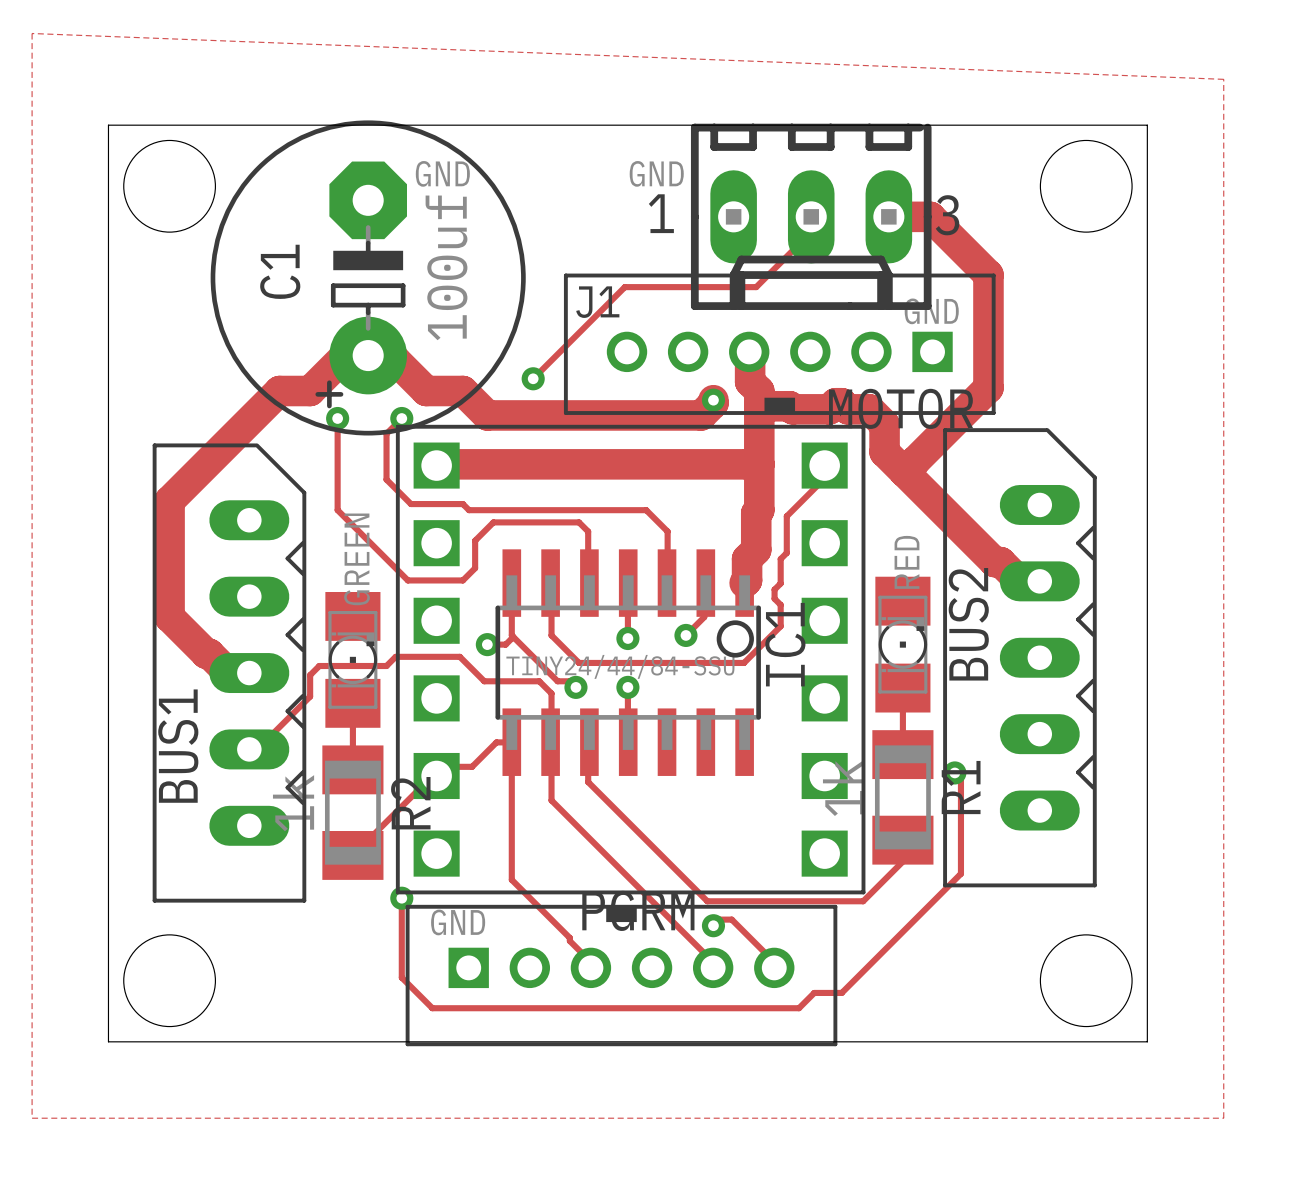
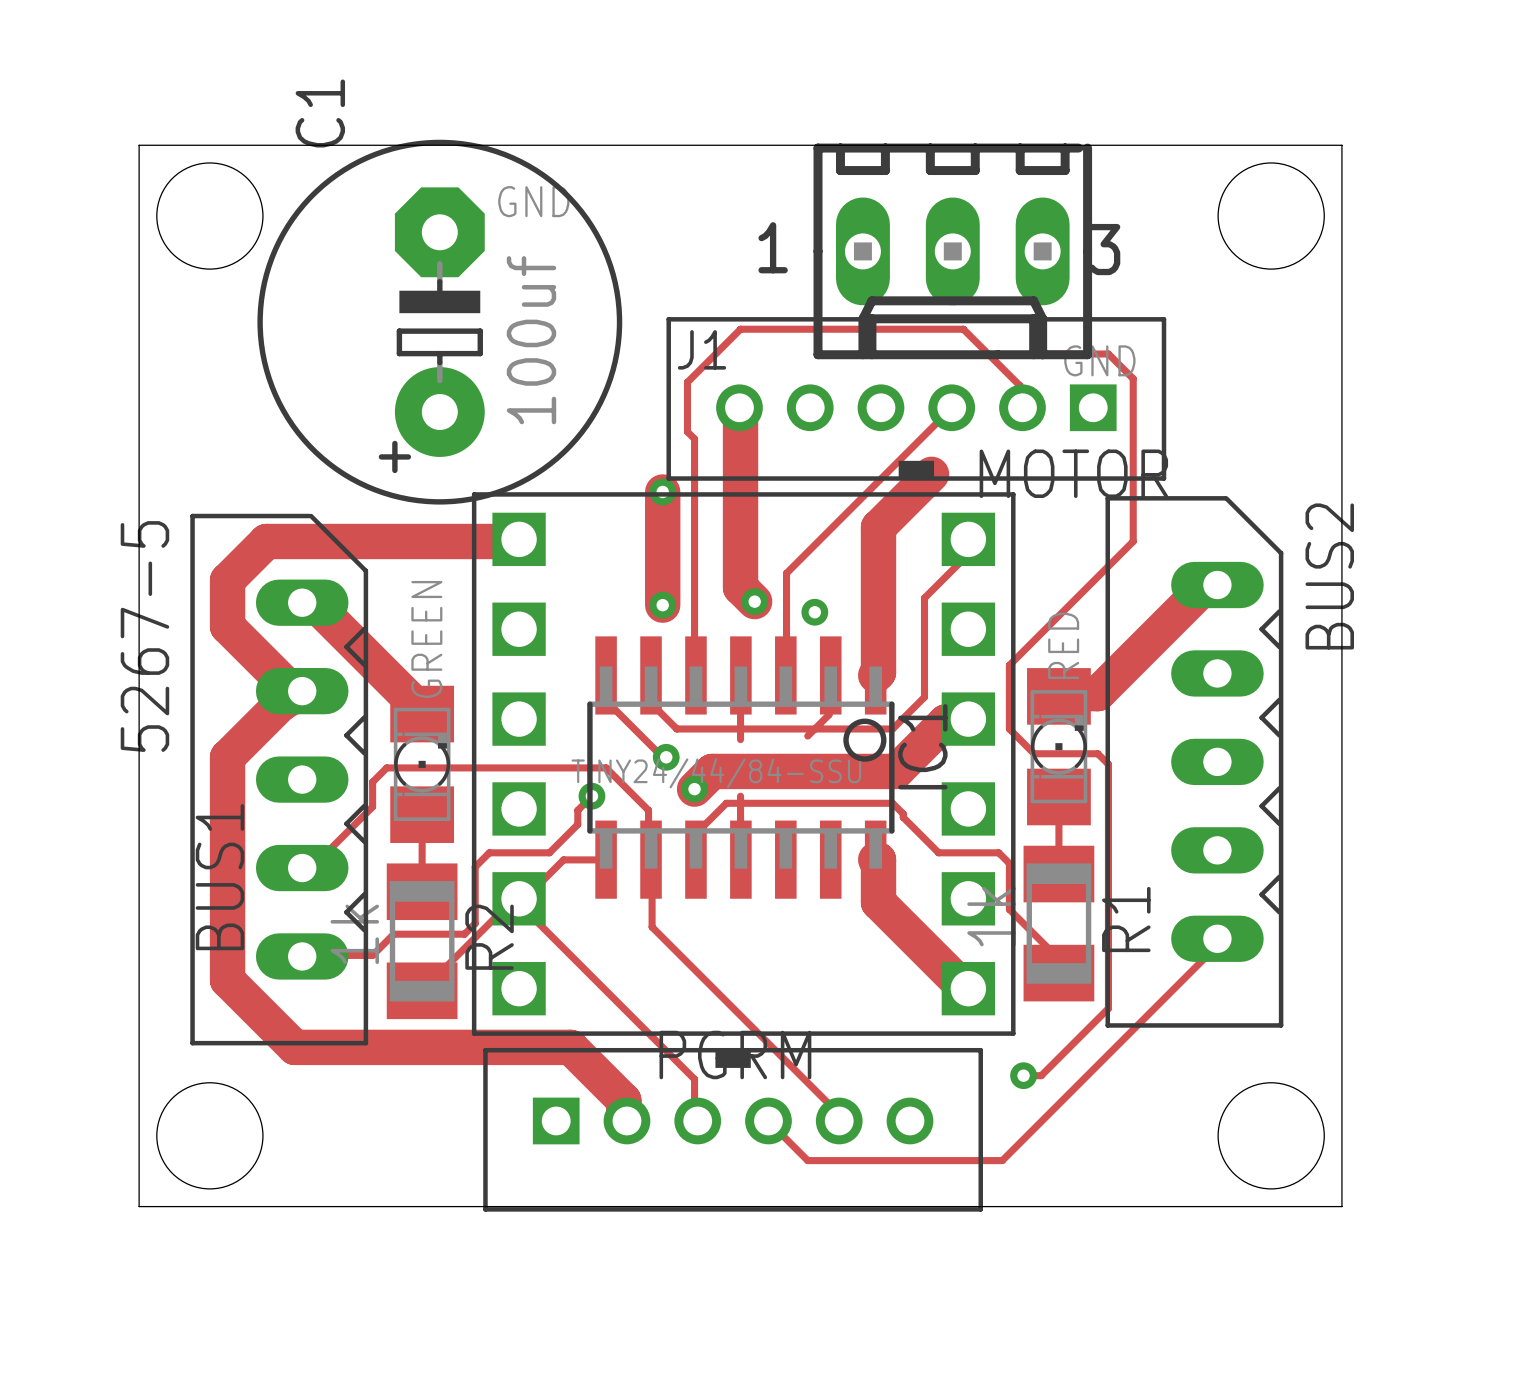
zone outline: (32, 33) (32, 1118) (1223, 1118) (1223, 79) (32, 33) -> none
text: GND (656, 173) -> none
track: (811, 216) (811, 232) (756, 287) (624, 287) -> (1022, 407) (1020, 407) (1020, 385) (963, 329) (740, 329) (737, 332)
track: (888, 216) (930, 216) (988, 274) (988, 387) (904, 471) -> none
C1 value position: 100uf (446, 267) -> 100uf (531, 340)
C1 name position: C1 (280, 271) -> C1 (320, 113)
track: none -> (1030, 354) (1108, 354) (1133, 378) (1133, 541) (1009, 665) (1009, 728) (1034, 753) (1097, 753) (1108, 764) (1108, 1008) (1041, 1075) (1023, 1075)
track: (582, 329) (533, 378) -> (687, 382) (687, 431) (694, 438) (694, 615)
track: none -> (739, 407) (740, 587) (754, 601)
track: (749, 351) (750, 381) (759, 391) (759, 510) (756, 513) (756, 549) (747, 559) -> (931, 474) (878, 527) (878, 647)
via position: (533, 378) -> (662, 491)
track: (713, 400) (713, 403) (701, 415) (487, 415) (462, 391) (426, 391) (395, 360) (380, 360) (368, 355) (368, 357) (343, 357) (310, 391) (279, 391) (169, 501) (169, 617) (227, 672) (249, 673) -> none
via: (713, 400) -> none
track: (759, 406) (789, 406) (792, 409) (829, 409) (835, 403) (841, 403) (847, 409) (869, 409) (884, 424) (884, 452) (994, 562) (1000, 562) (1019, 580) (1039, 581) -> none
track: (337, 418) (337, 510) (407, 580) (462, 580) (475, 568) (475, 540) (493, 522) (579, 522) (588, 531) -> none
via: (337, 418) -> none
track: (401, 418) (386, 433) (386, 479) (410, 504) (462, 504) (469, 510) (646, 510) (667, 531) -> (951, 407) (786, 573) (786, 615)
via: (401, 418) -> none
track: none -> (662, 491) (662, 605)
track: (759, 464) (436, 465) -> (626, 1120) (623, 1118) (623, 1100) (570, 1047) (294, 1047) (227, 980) (227, 757) (280, 704) (302, 691) (291, 690) (227, 626) (227, 580) (266, 541) (517, 541) (519, 539)
track: none -> (1217, 585) (1214, 587) (1203, 587) (1097, 693) (1058, 693) (1058, 696)
via: none -> (754, 601)
track: none -> (302, 602) (305, 605) (316, 605) (422, 711) (422, 714)
via: none -> (662, 605)
via: none -> (814, 612)
BUS1 value: none -> 5267-5 (144, 636)
track: (786, 552) (780, 559) (780, 583) (774, 589) (774, 598) (780, 604) (780, 626) (744, 662) (579, 662) (551, 635) (551, 607) -> (924, 640) (924, 697) (892, 728) (676, 728) (652, 704)
track: (511, 604) (511, 635) (557, 681) (569, 681) (575, 687) -> (606, 700) (662, 757) (666, 757)
track: none -> (968, 719) (966, 721) (945, 721) (896, 771) (712, 771) (694, 789)
BUS2 name position: BUS2 (968, 624) -> BUS2 (1329, 576)
via: (685, 635) -> none
track: (513, 636) (505, 644) (487, 644) -> none
via: (627, 638) -> none
via: (487, 644) -> none
via: none -> (666, 757)
track: (319, 666) (386, 666) (395, 656) (459, 656) (484, 681) (539, 681) (551, 693) (550, 742) -> (383, 771) (386, 767) (606, 767) (648, 810) (648, 856) (651, 859)
track: none -> (591, 796) (577, 810) (577, 824) (549, 852) (489, 852) (475, 866) (475, 923) (464, 934) (393, 934) (372, 955) (302, 956)
via: none -> (591, 796)
via position: (575, 687) -> (694, 789)
via: (627, 687) -> none
track: (496, 742) (472, 766) (447, 766) (438, 776) -> none
track: (511, 742) (511, 879) (569, 937) (569, 941) (588, 959) -> (588, 859) (563, 859) (521, 902) (519, 898) (521, 905) (694, 1079) (694, 1111)
track: (589, 742) (588, 782) (707, 901) (863, 901) (902, 861) (902, 840) -> (695, 859) (698, 856) (698, 831) (726, 803) (892, 803) (903, 813) (903, 817) (938, 852) (998, 852) (1009, 863) (1009, 909) (1058, 958) (1058, 973)
track: none -> (875, 859) (878, 859) (878, 902) (966, 990) (968, 988)
track: (954, 772) (960, 779) (960, 873) (841, 992) (814, 992) (799, 1008) (432, 1008) (401, 977) (401, 898) -> none
via: (954, 772) -> none
track: none -> (1217, 938) (1214, 941) (1214, 948) (1002, 1160) (807, 1160) (768, 1120)
via: (401, 898) -> none
text: GND (458, 922) -> none
track: (713, 925) (719, 919) (731, 919) (771, 959) (771, 965) (774, 967) -> none
via: (713, 925) -> none
via: none -> (1023, 1075)

